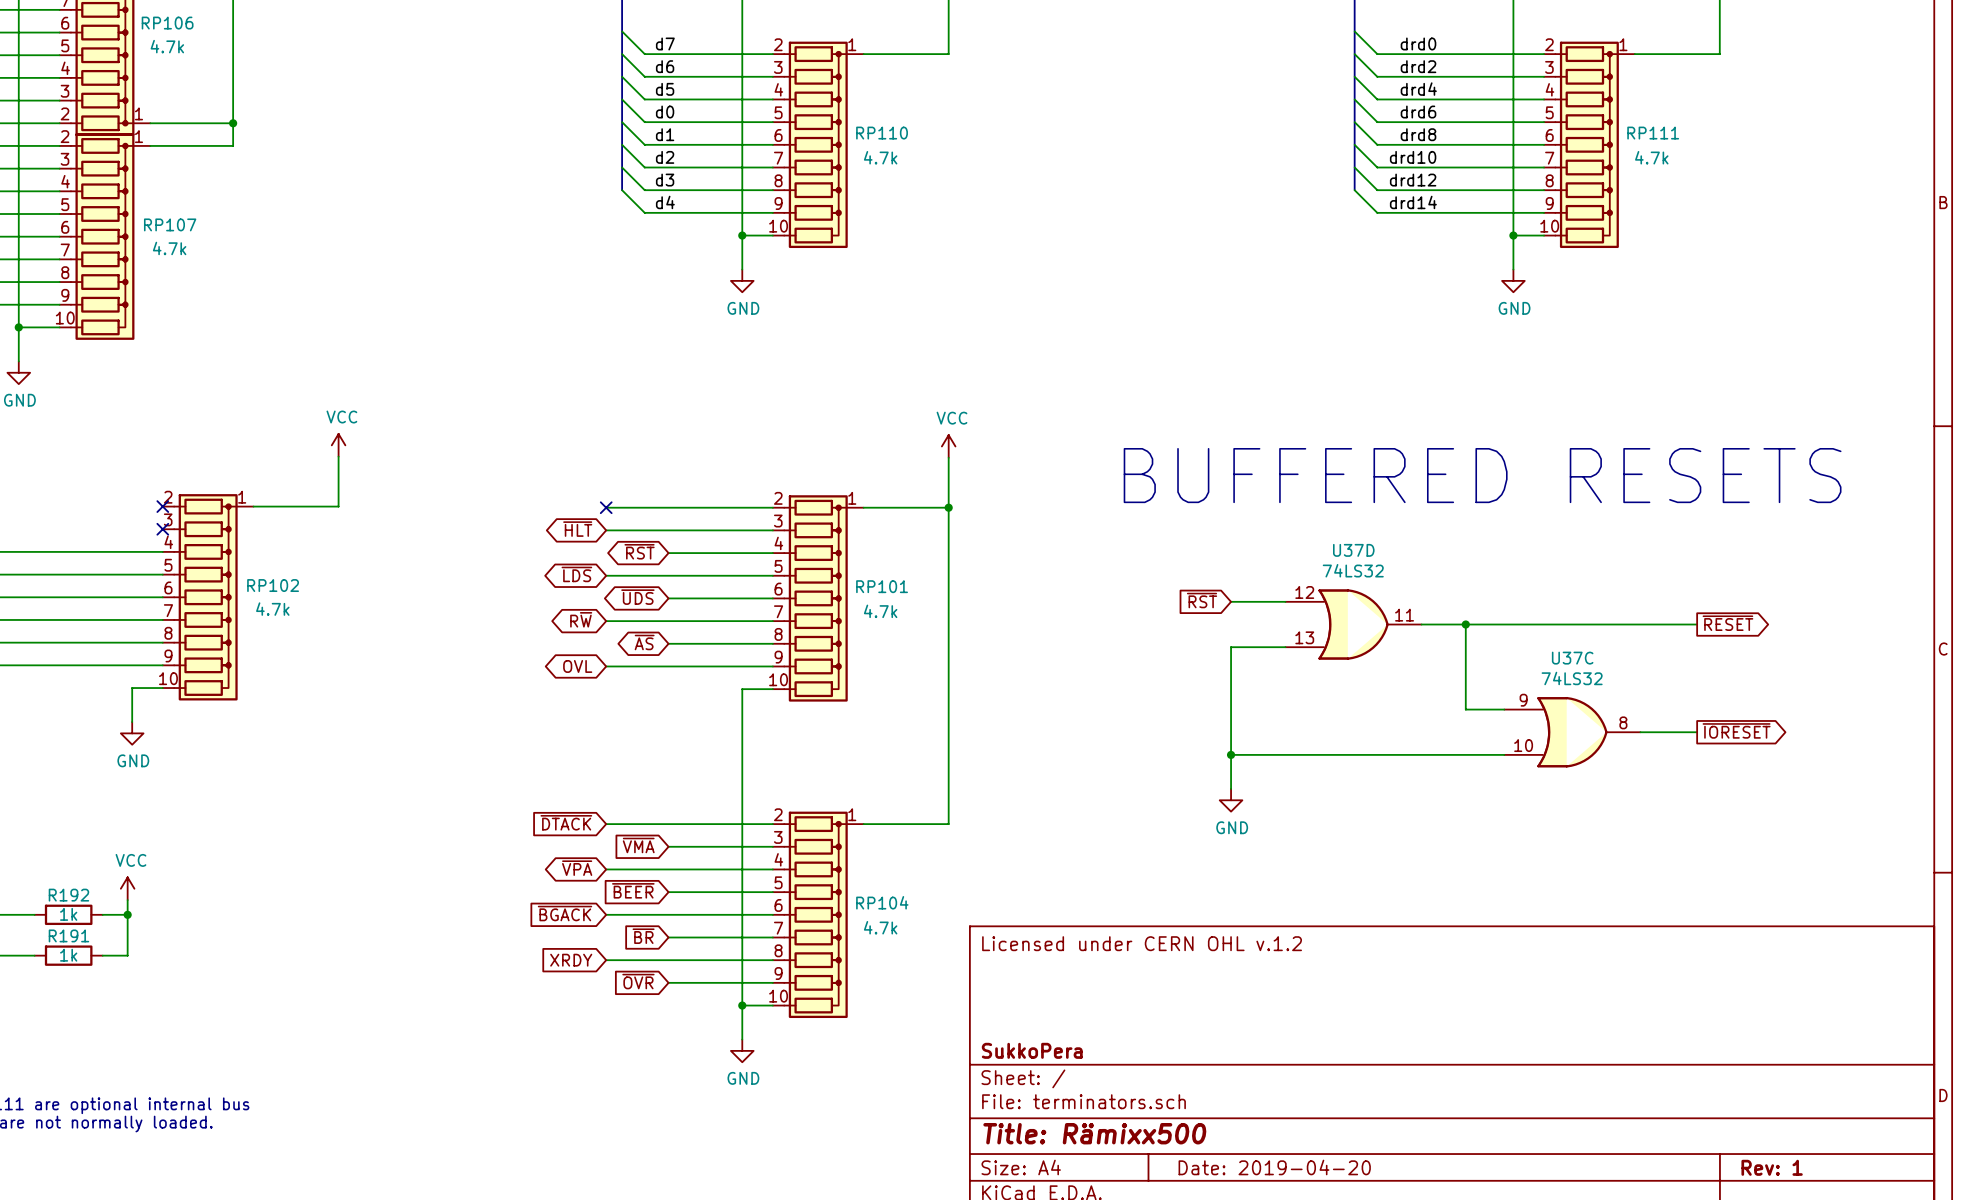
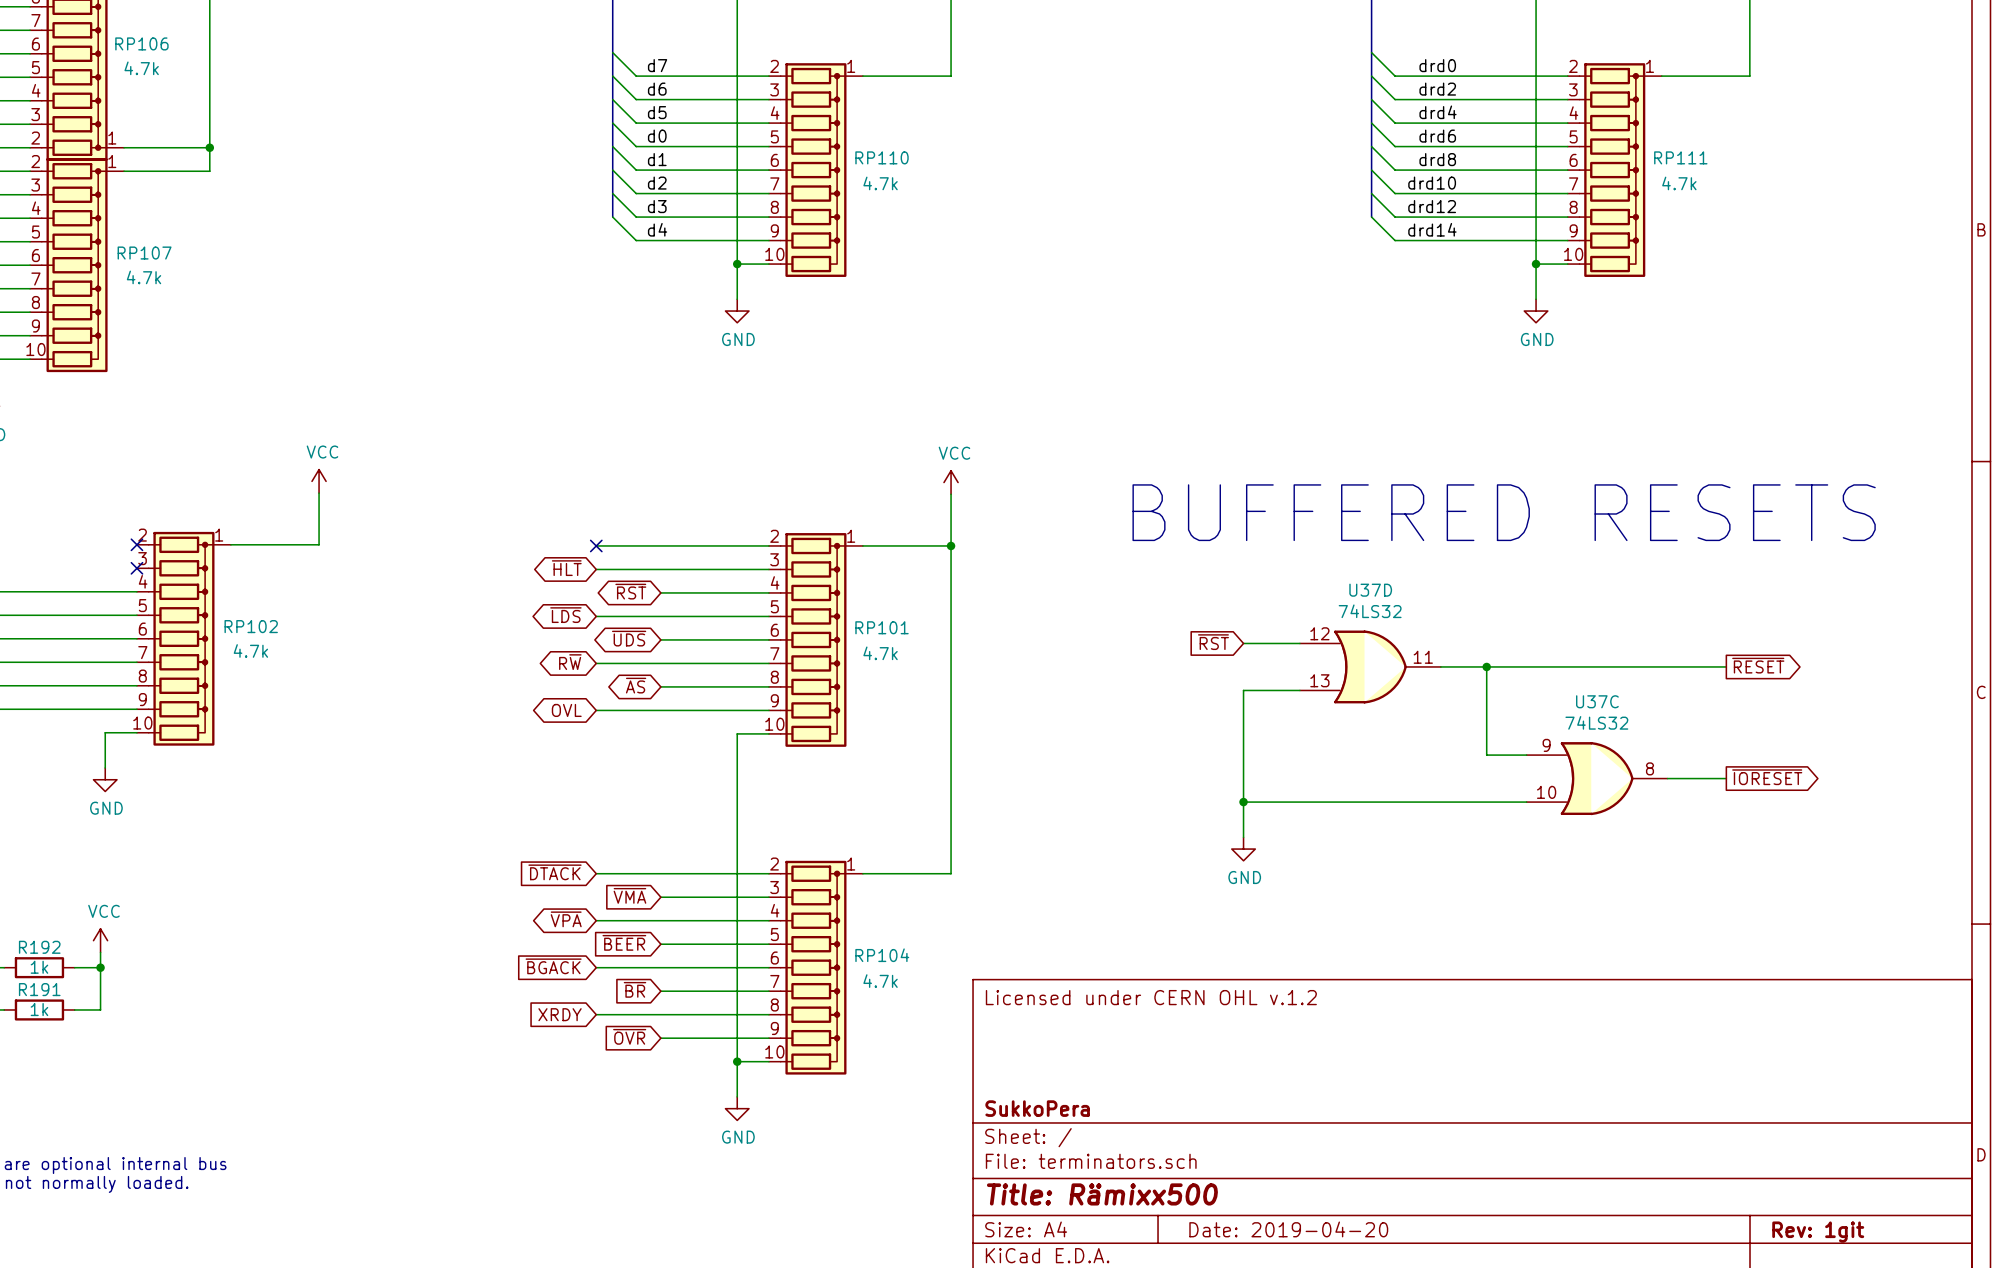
title block: Rev: 1 (1772, 1167) -> Rev: 1git (1818, 1232)

